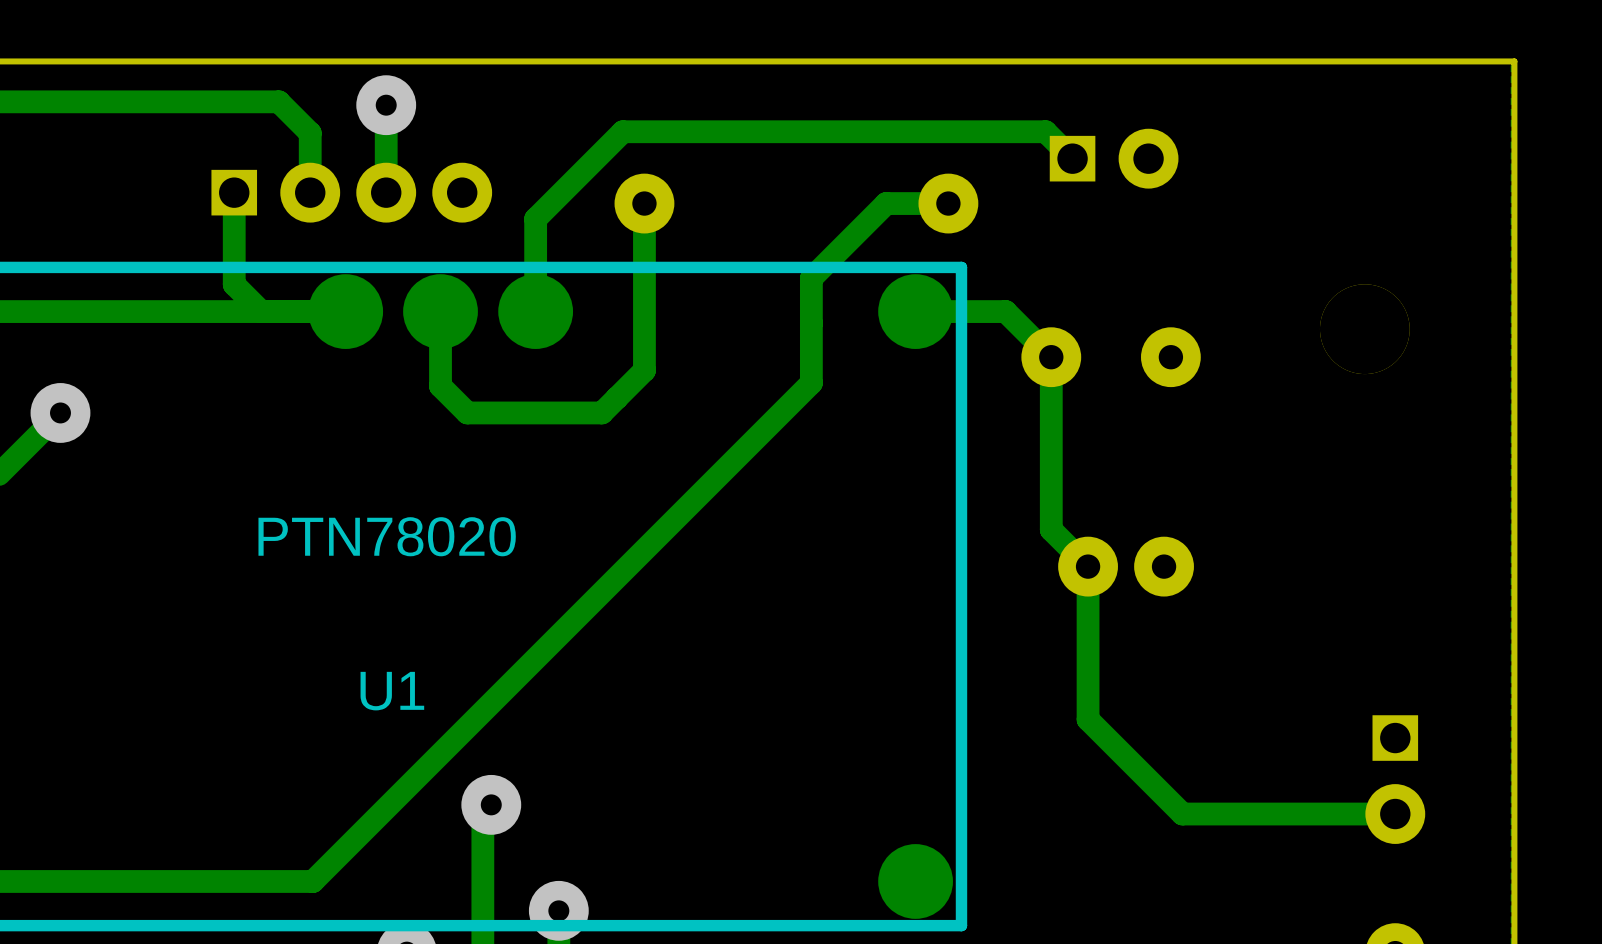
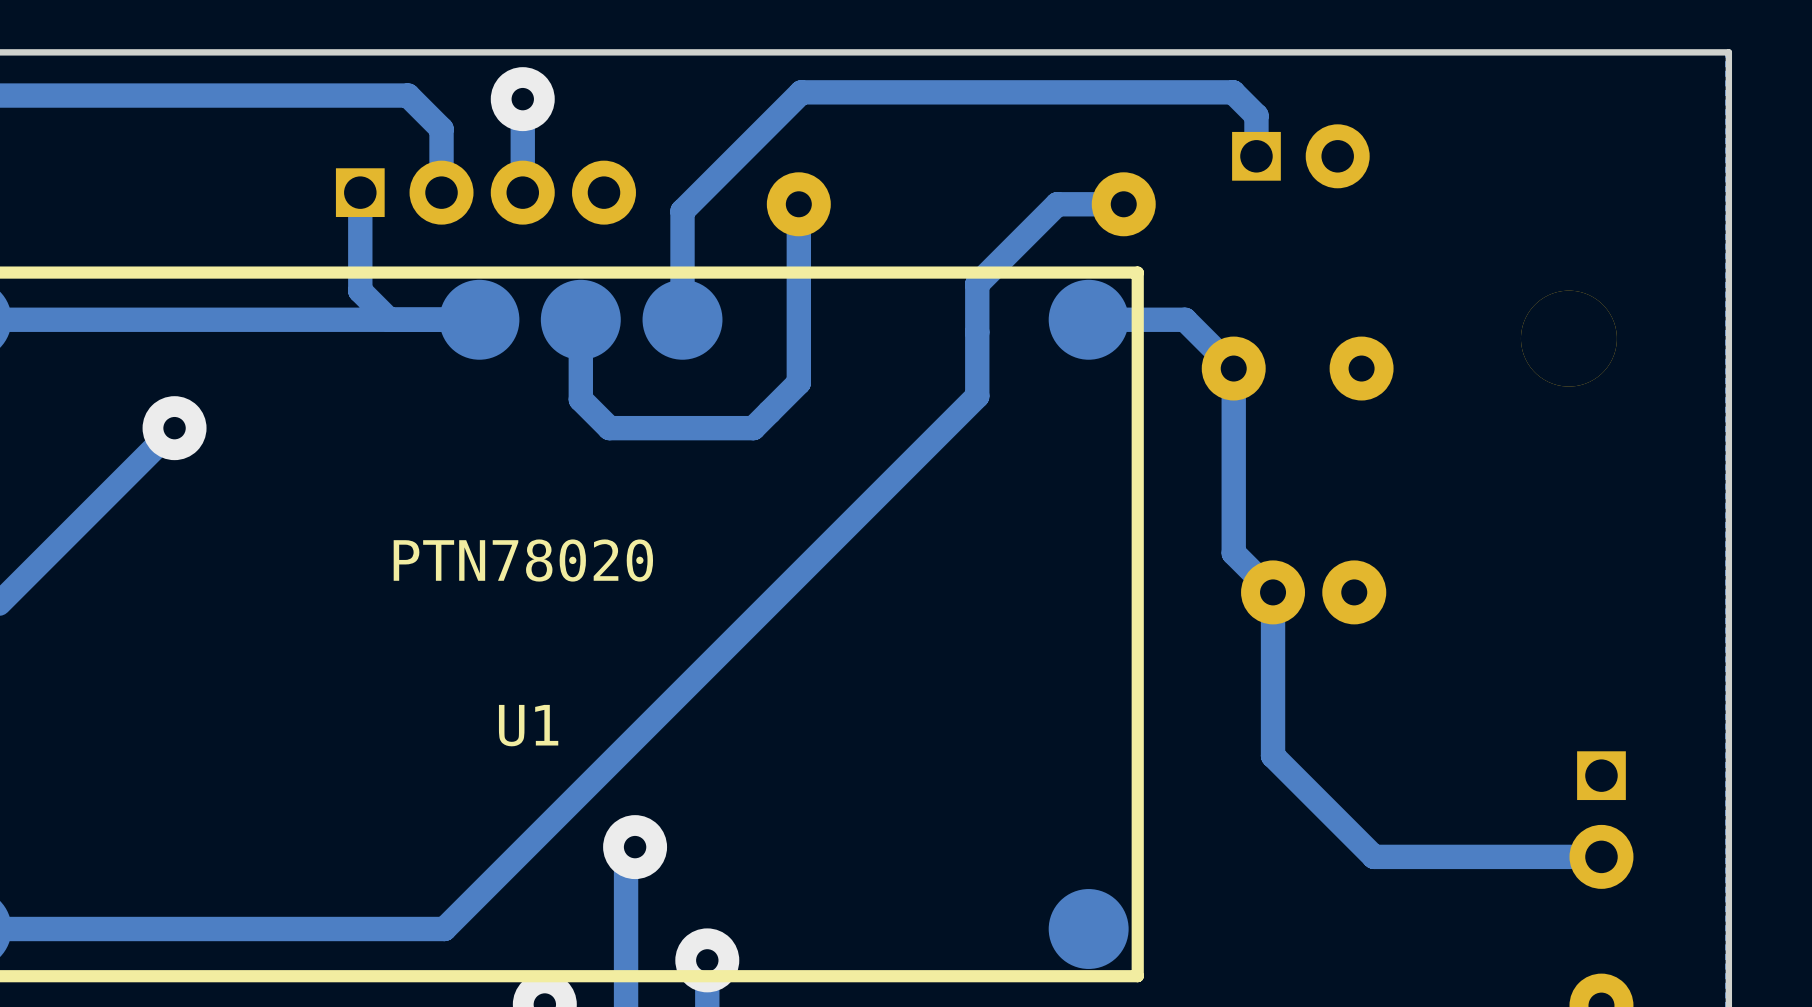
track: (1072, 158) (1045, 131) (622, 131) (535, 219) -> (1256, 156) (1256, 115) (1233, 92) (801, 92) (682, 211) (682, 220)

